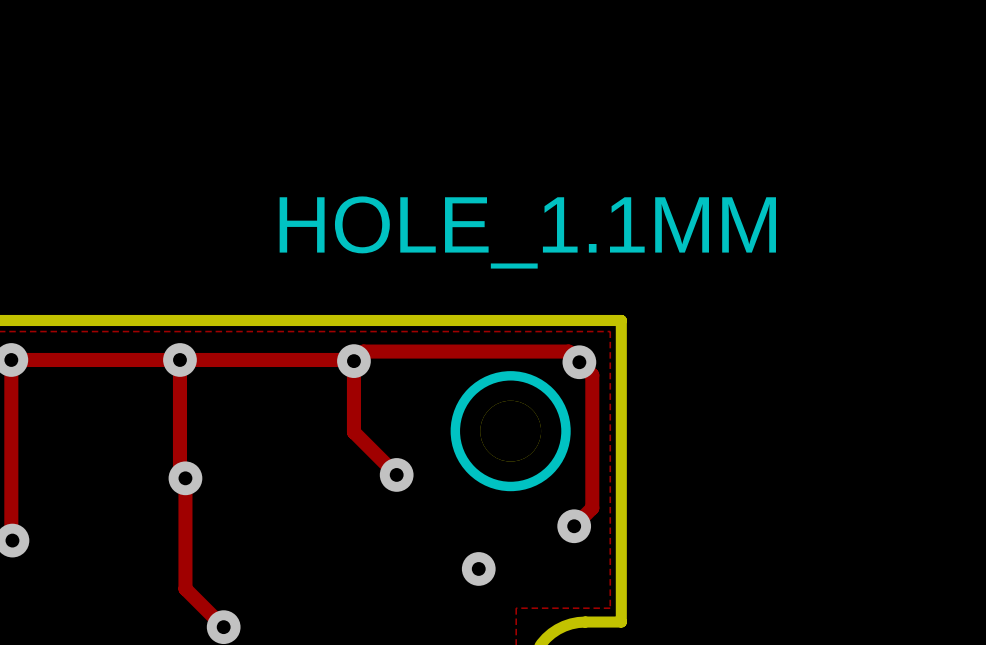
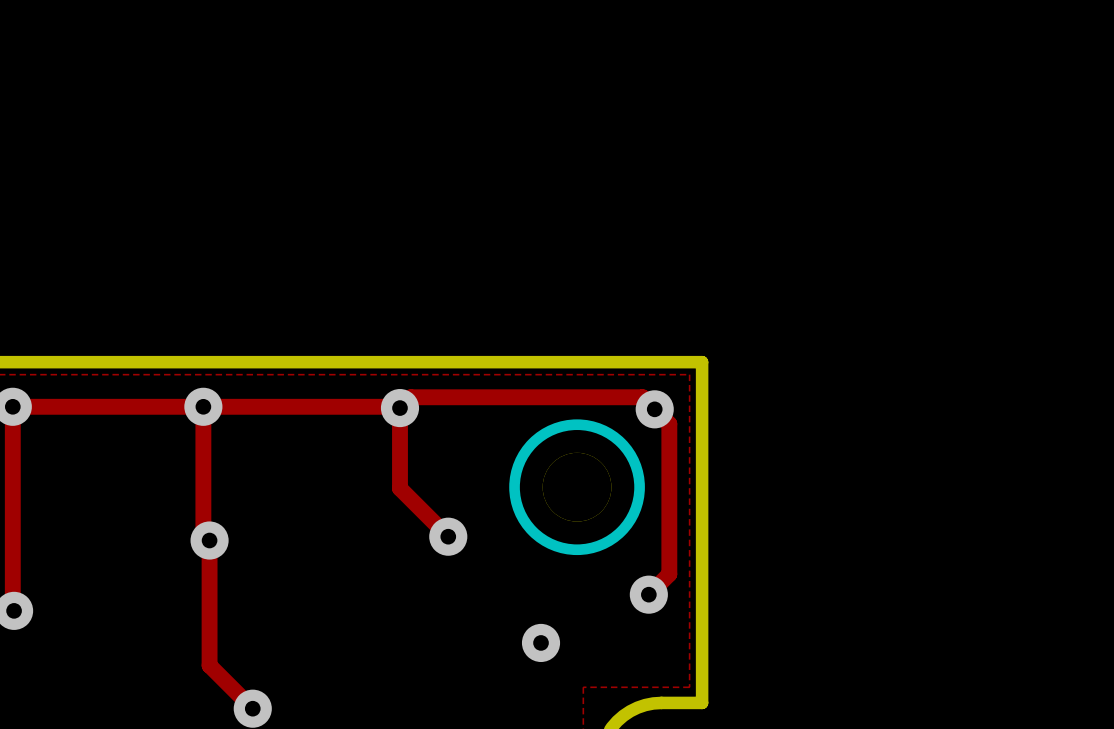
HOLE_1.1MM name: HOLE_1.1MM (527, 232) -> none

